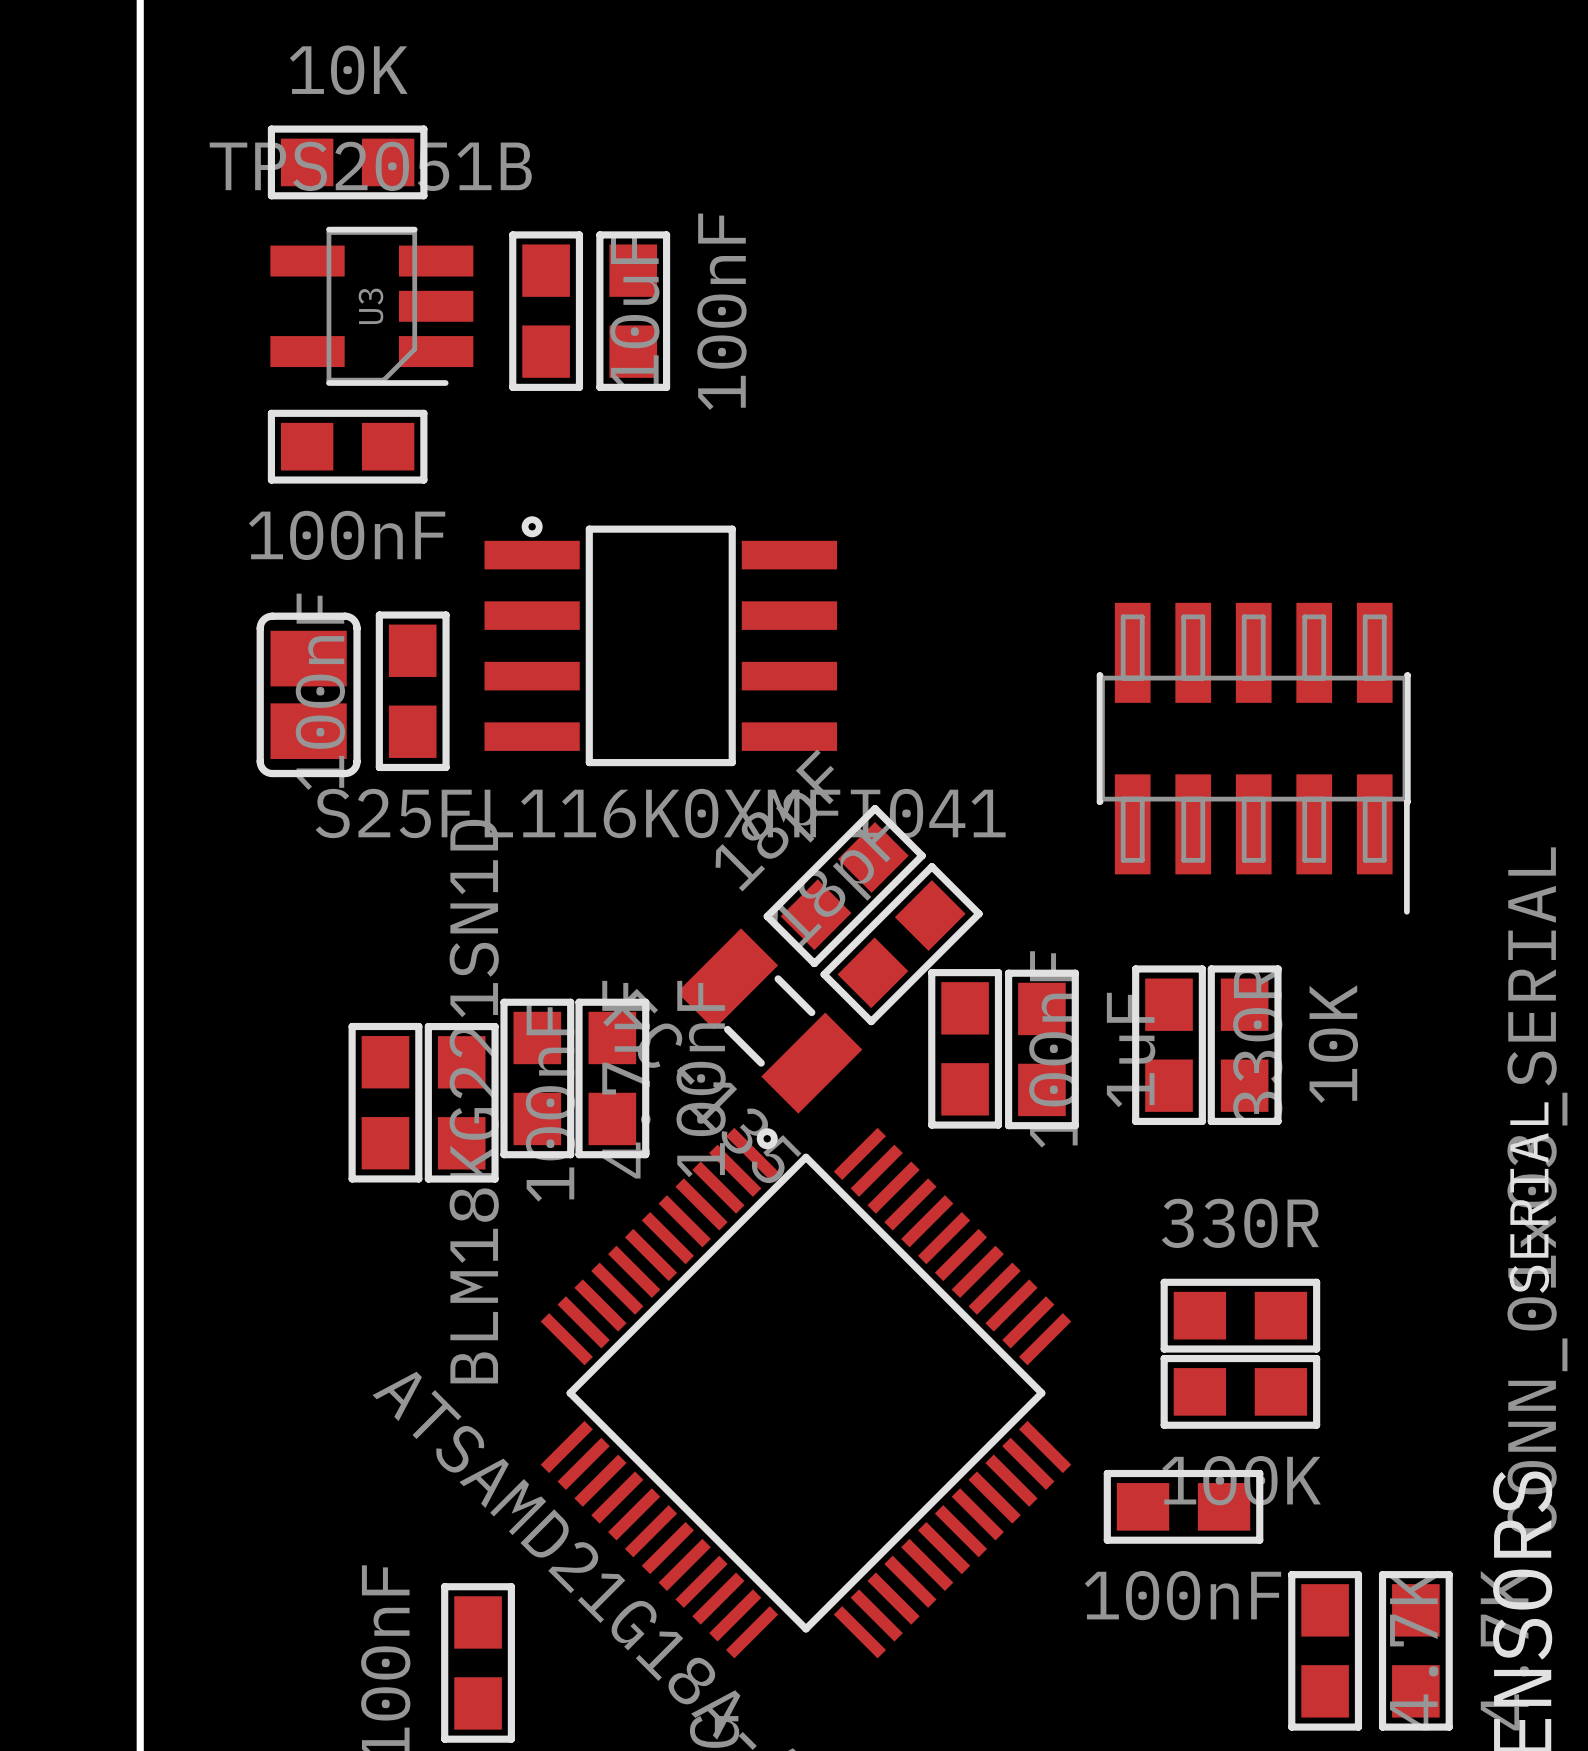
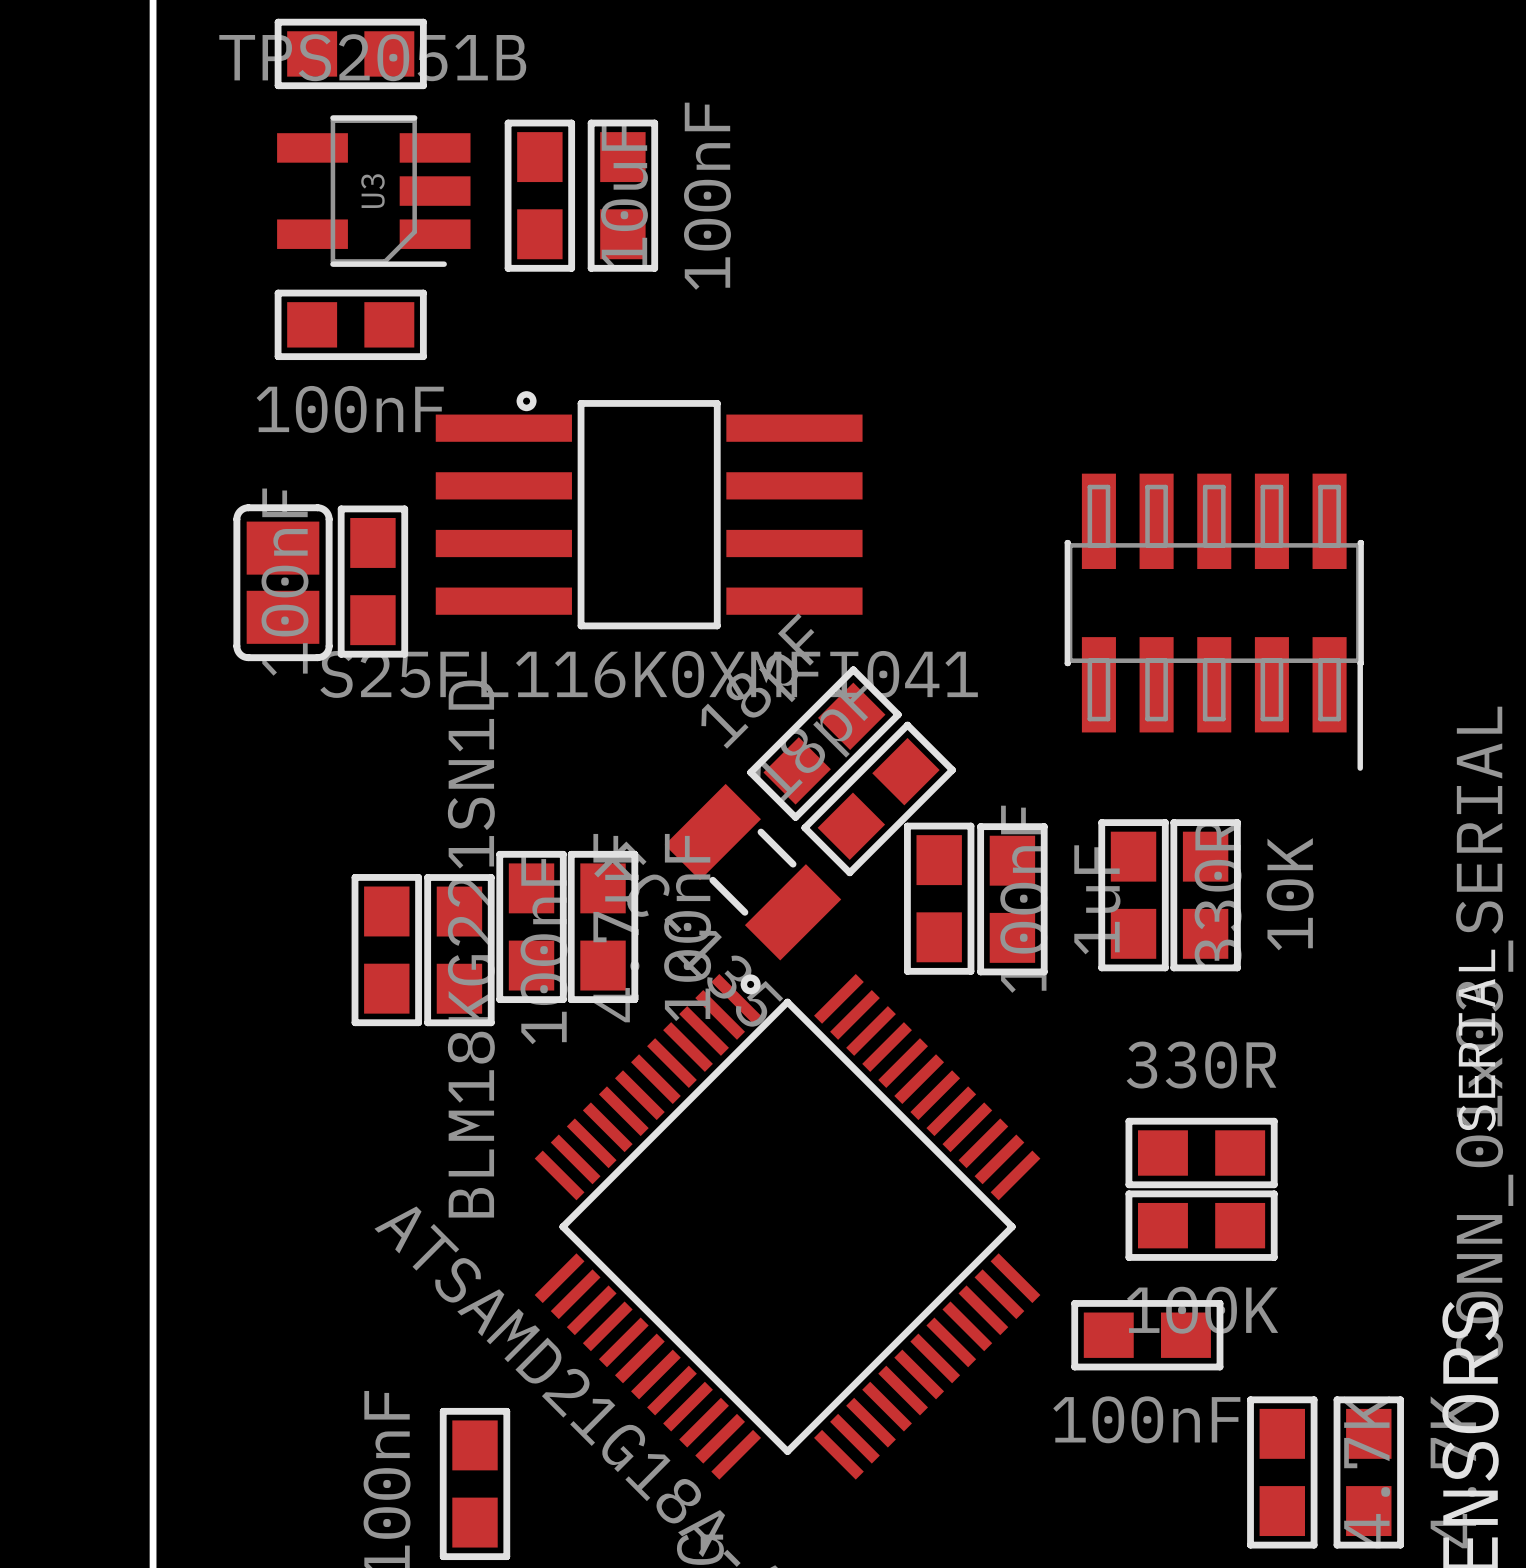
part footprint: [484, 516, 838, 767] -> [435, 391, 863, 630]
part position: (412, 691) -> (372, 581)
part position: (308, 694) -> (282, 582)

